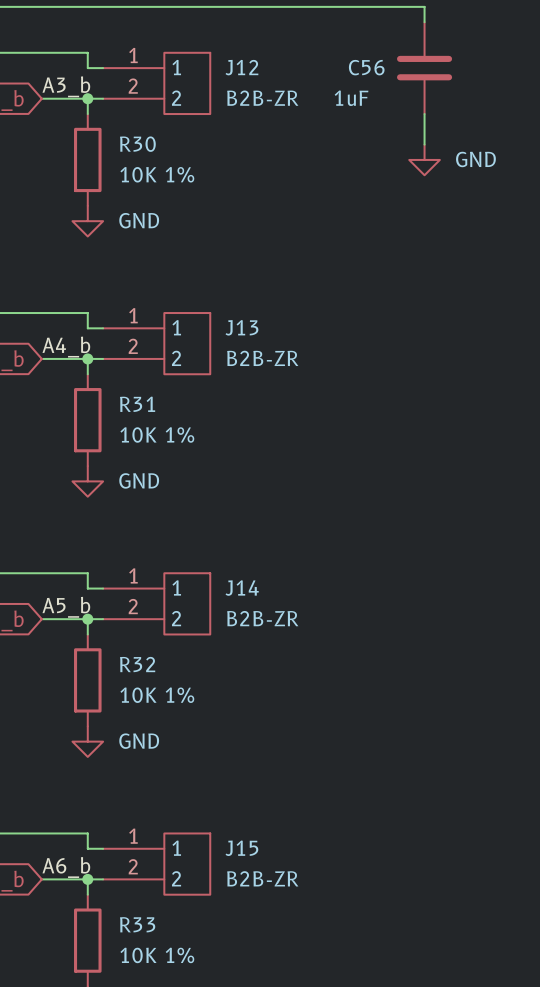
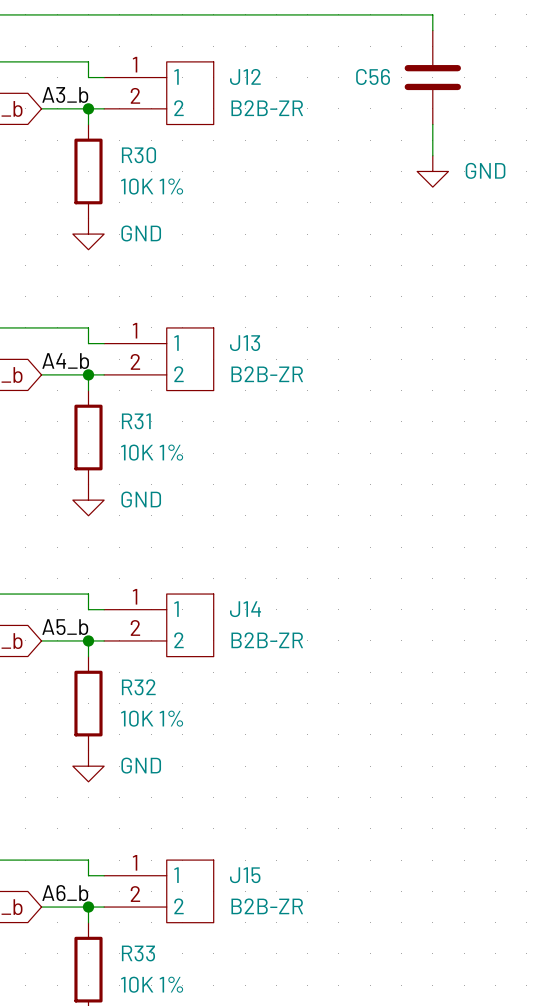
C56 value: 1uF (351, 98) -> none

